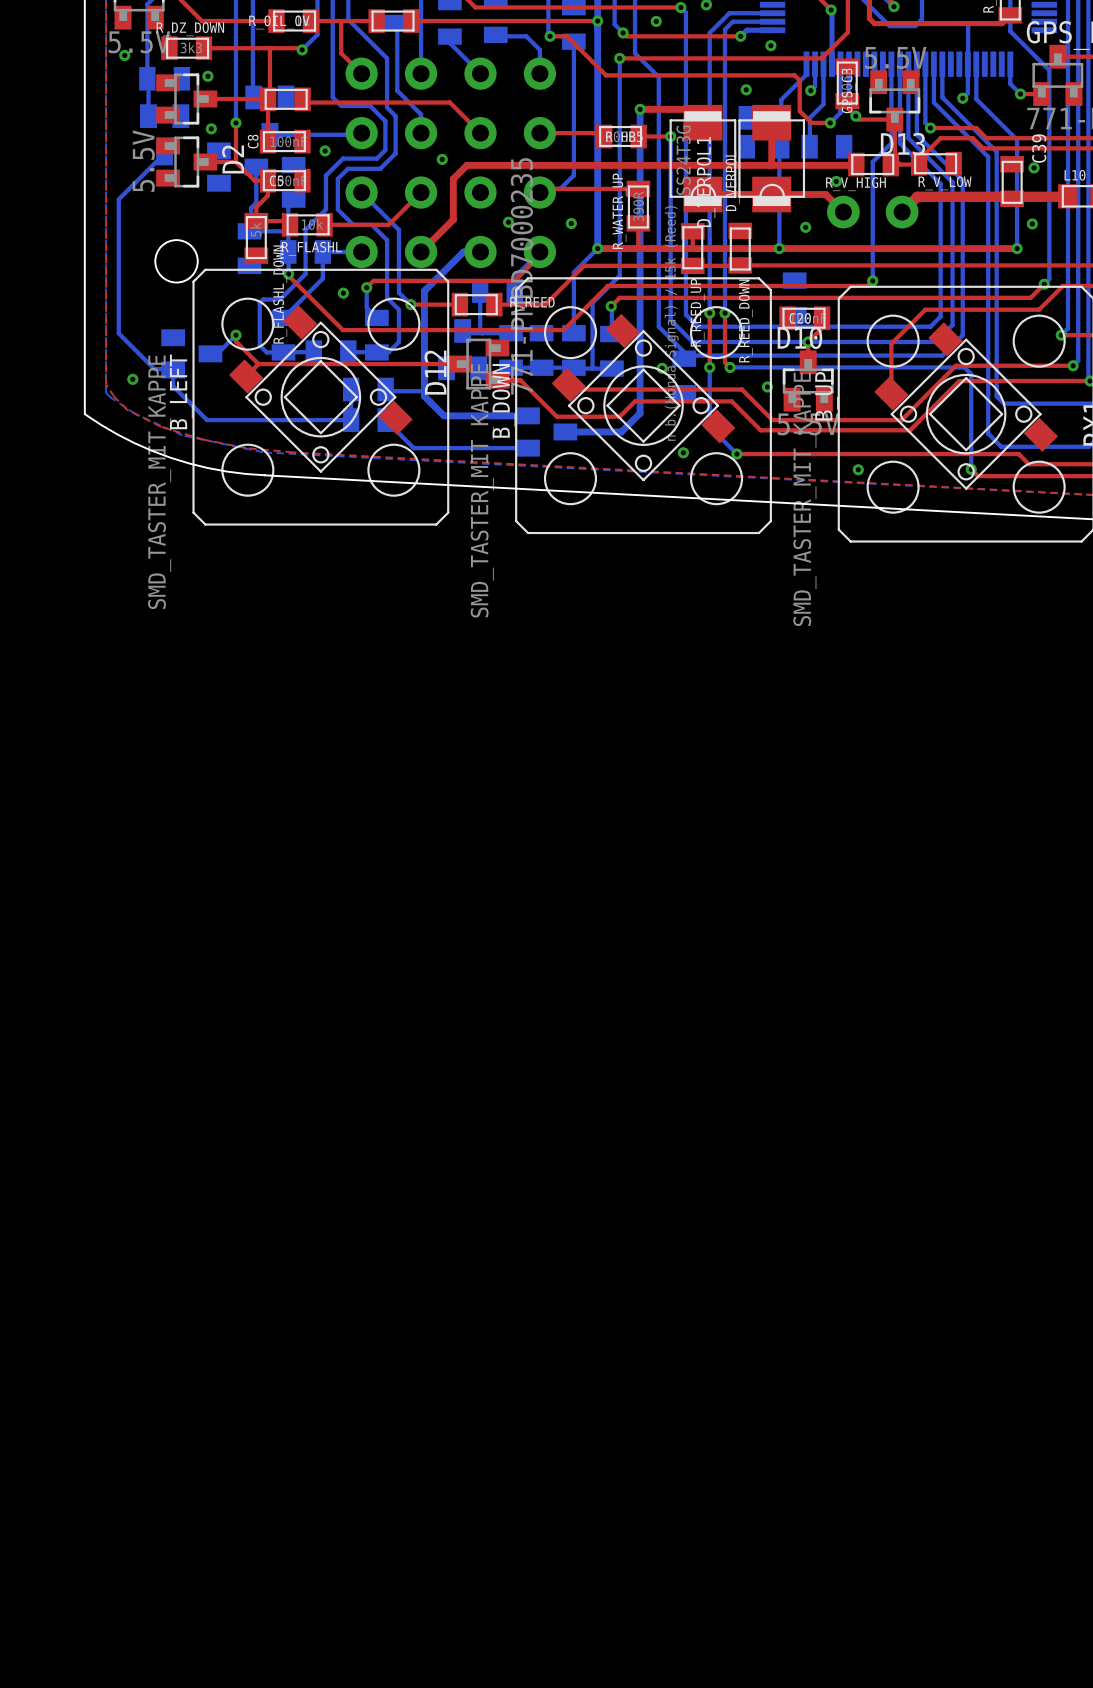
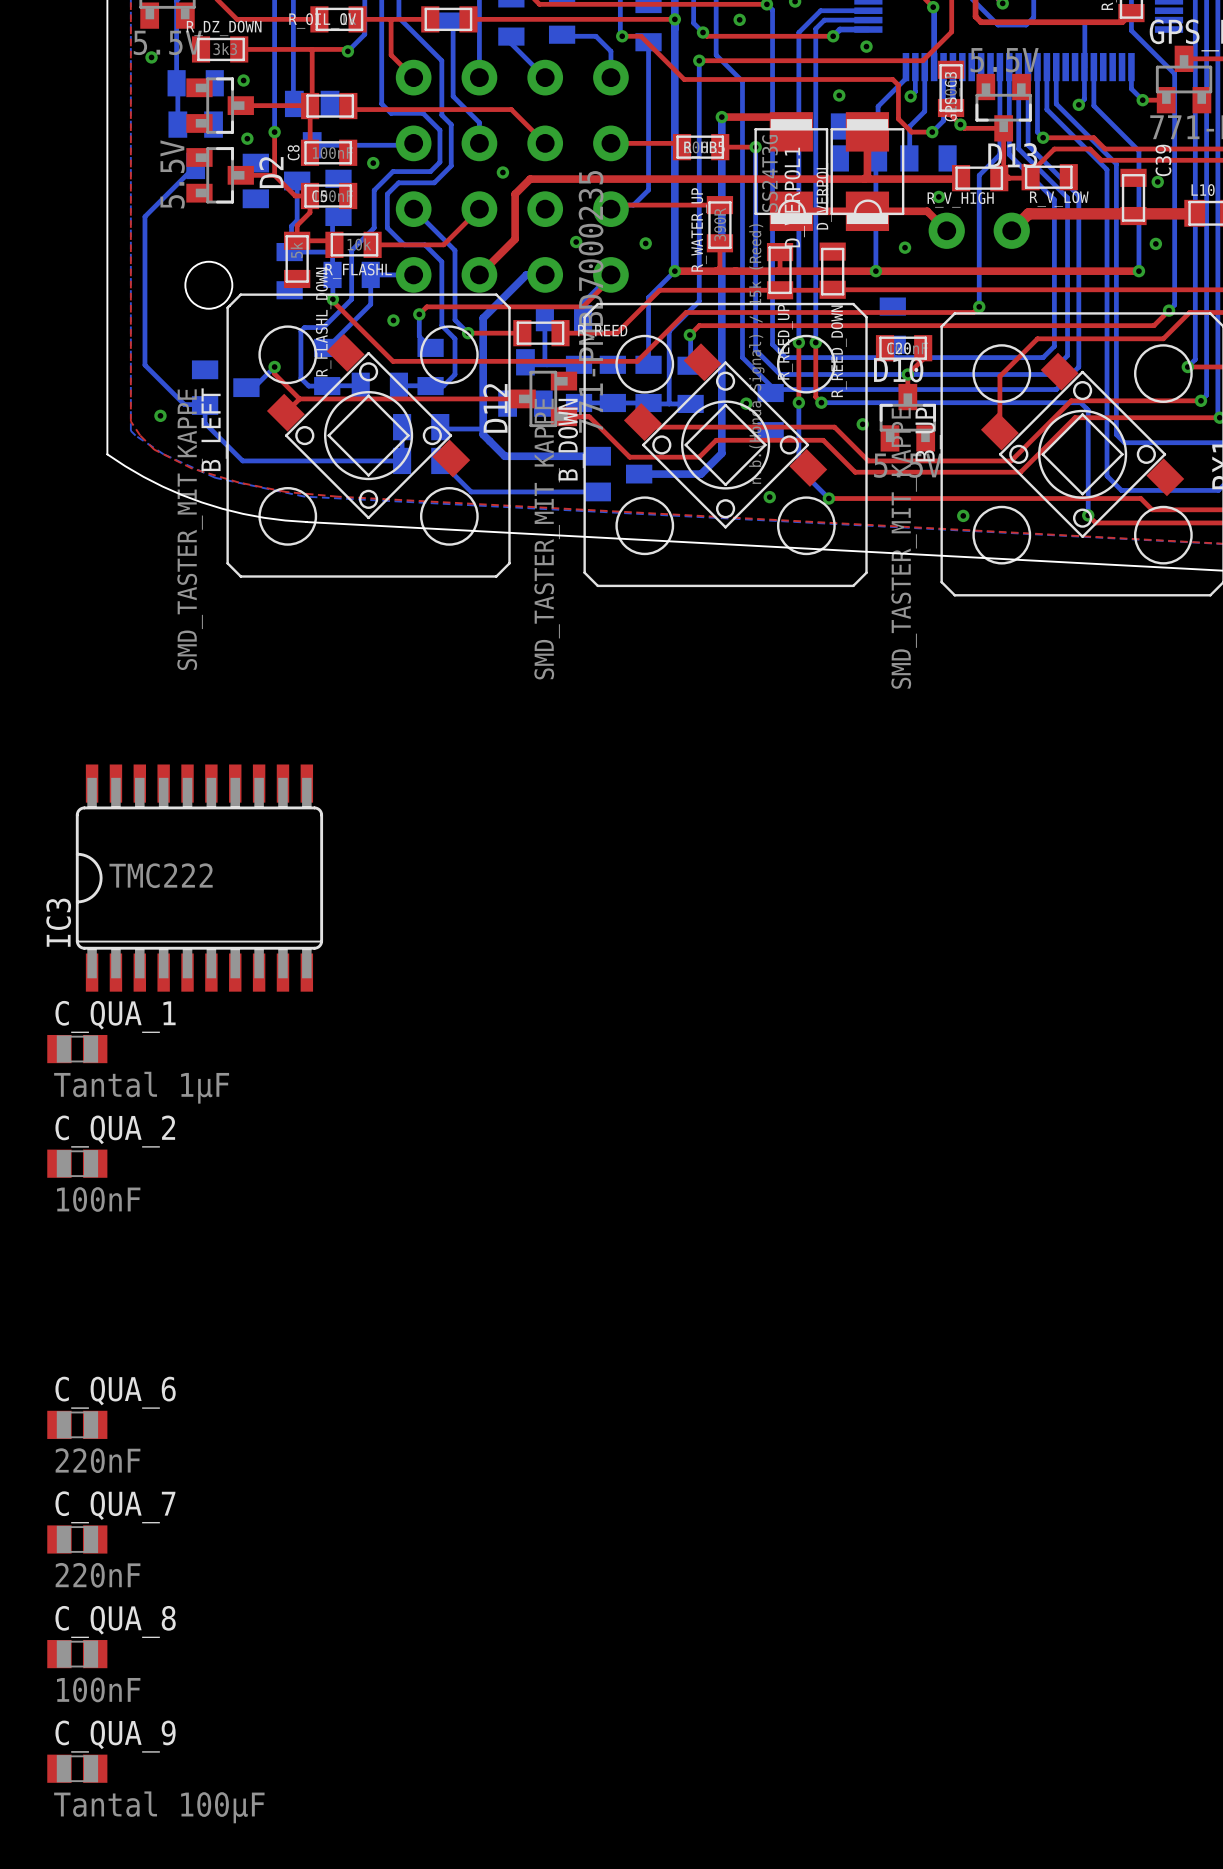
IC3: none -> TMC222 (199, 878)
C_QUA_1: none -> Tantal 1µF (77, 1049)
C_QUA_2: none -> 100nF (77, 1163)
C_QUA_6: none -> 220nF (77, 1424)
C_QUA_7: none -> 220nF (77, 1539)
C_QUA_8: none -> 100nF (77, 1654)
C_QUA_9: none -> Tantal 100µF (77, 1768)

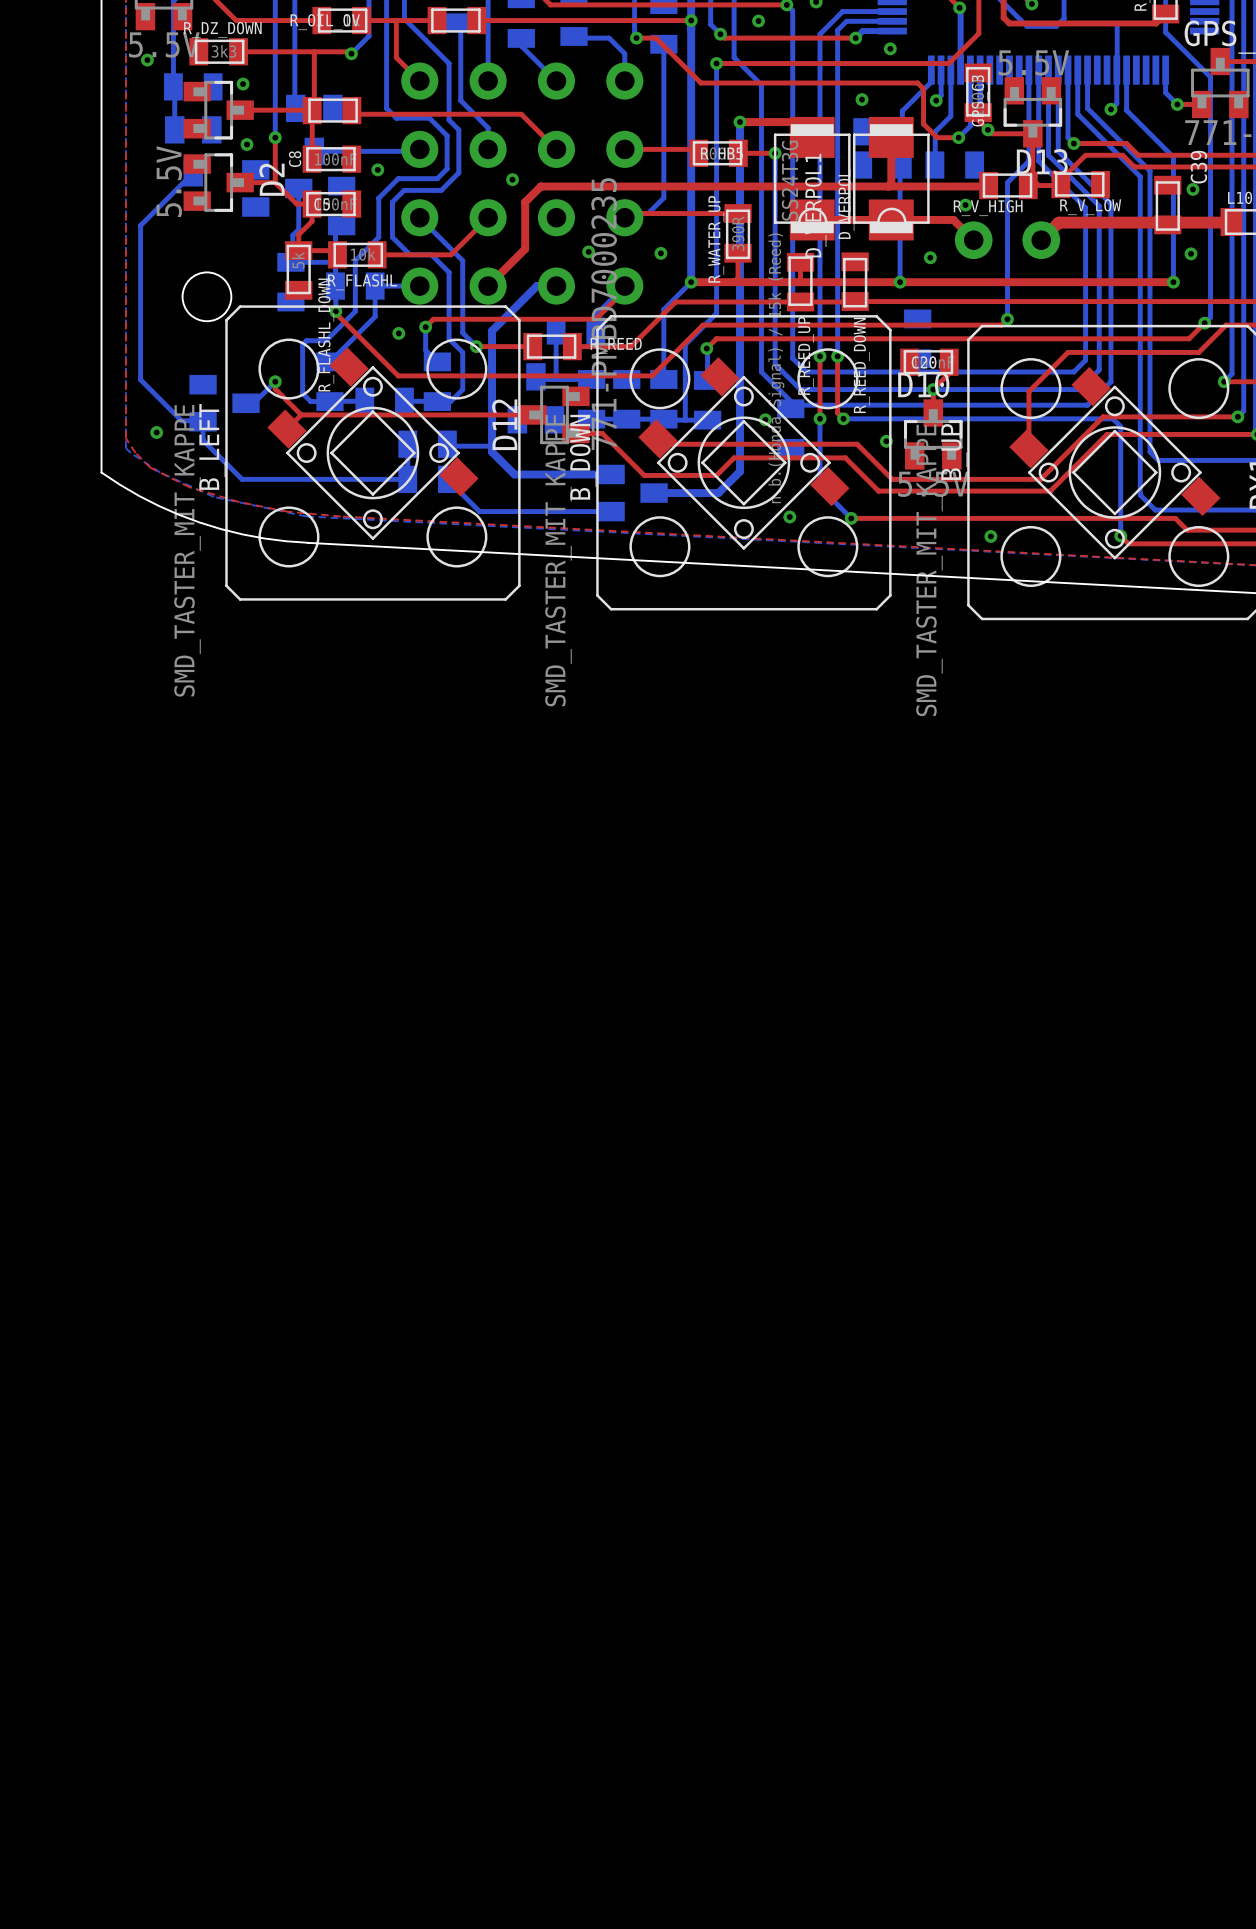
IC3: TMC222 (199, 878) -> none
C_QUA_1: Tantal 1µF (77, 1049) -> none
C_QUA_2: 100nF (77, 1163) -> none
C_QUA_6: 220nF (77, 1424) -> none
C_QUA_7: 220nF (77, 1539) -> none
C_QUA_8: 100nF (77, 1654) -> none
C_QUA_9: Tantal 100µF (77, 1768) -> none

